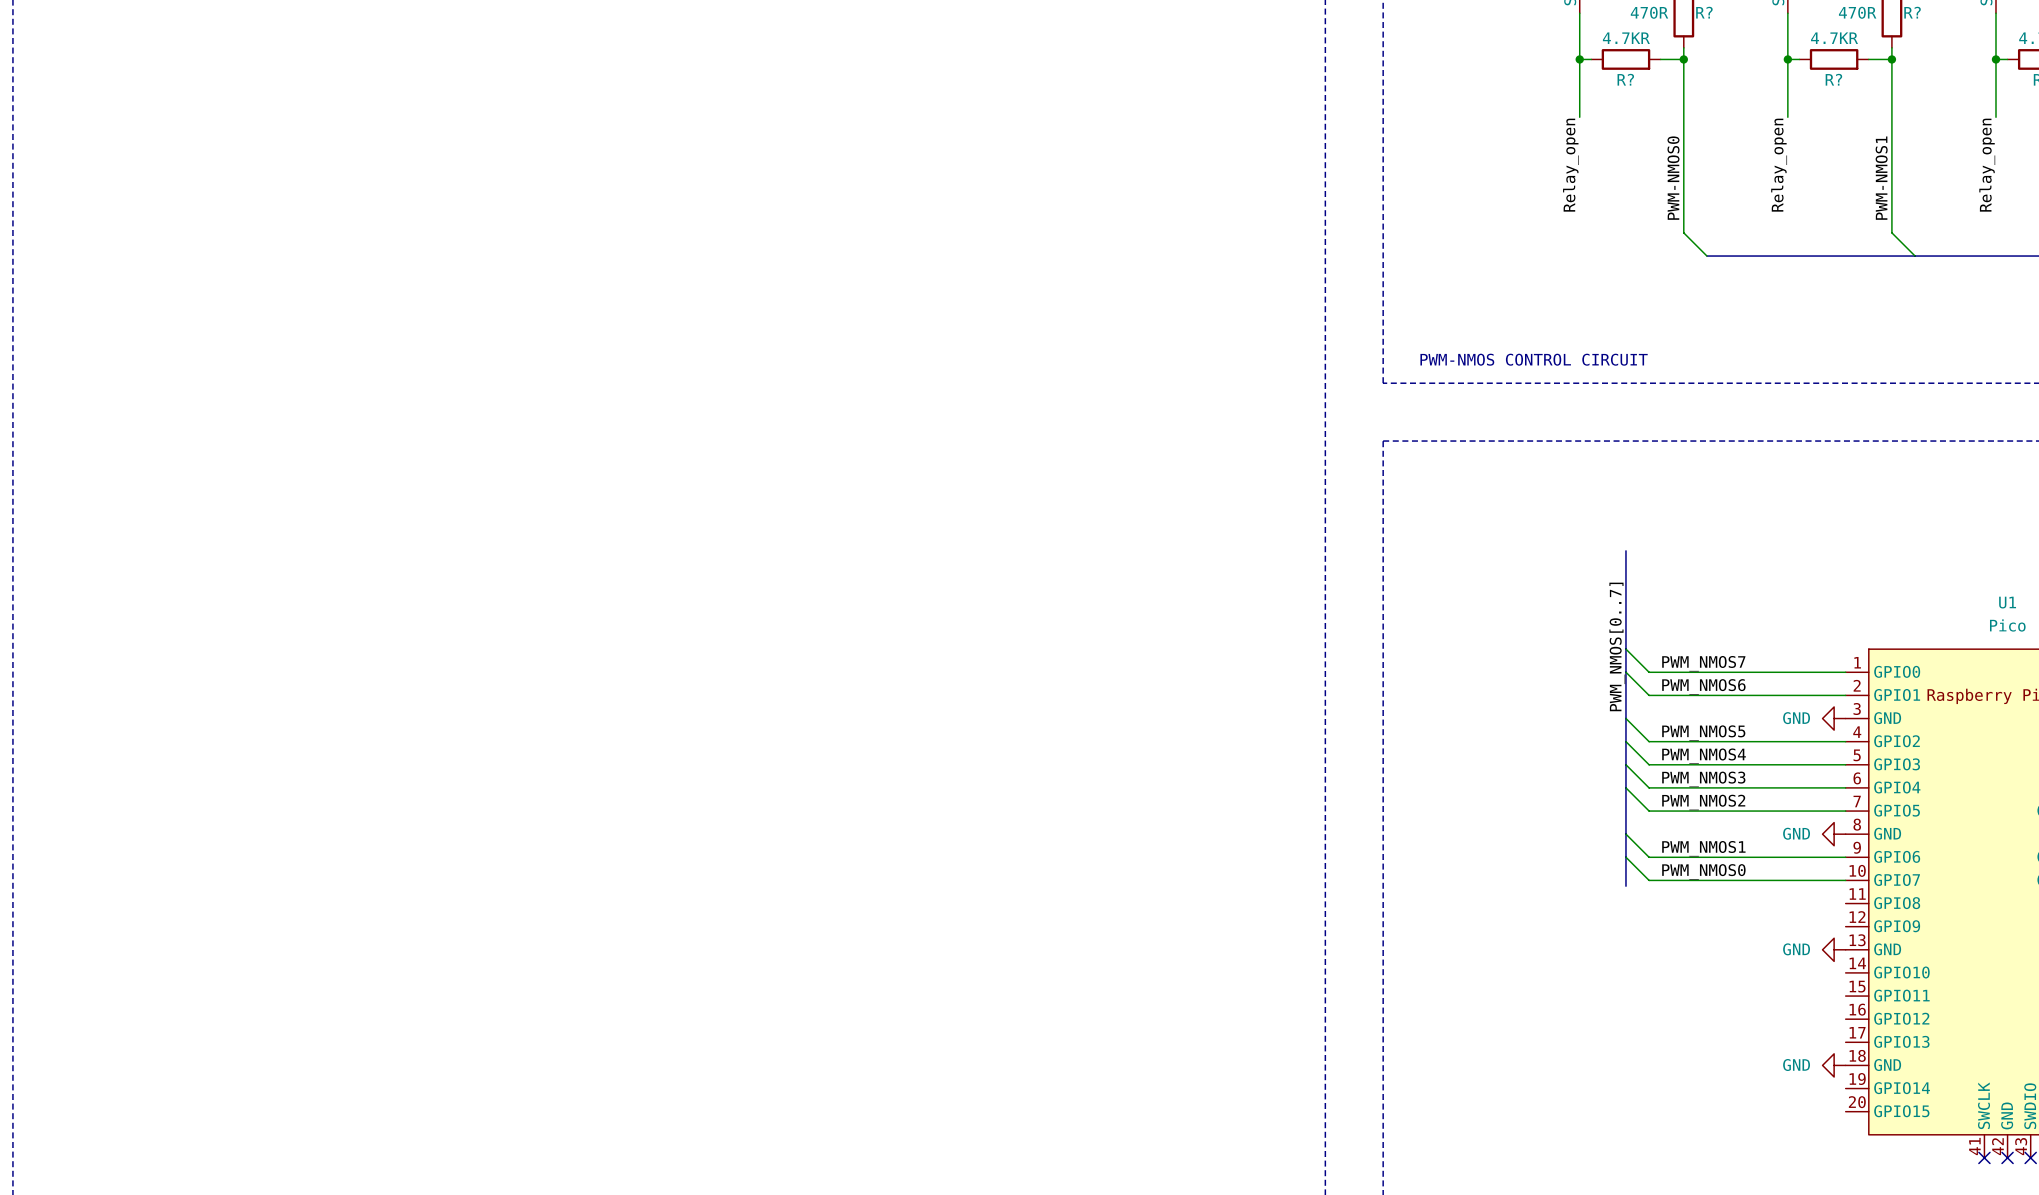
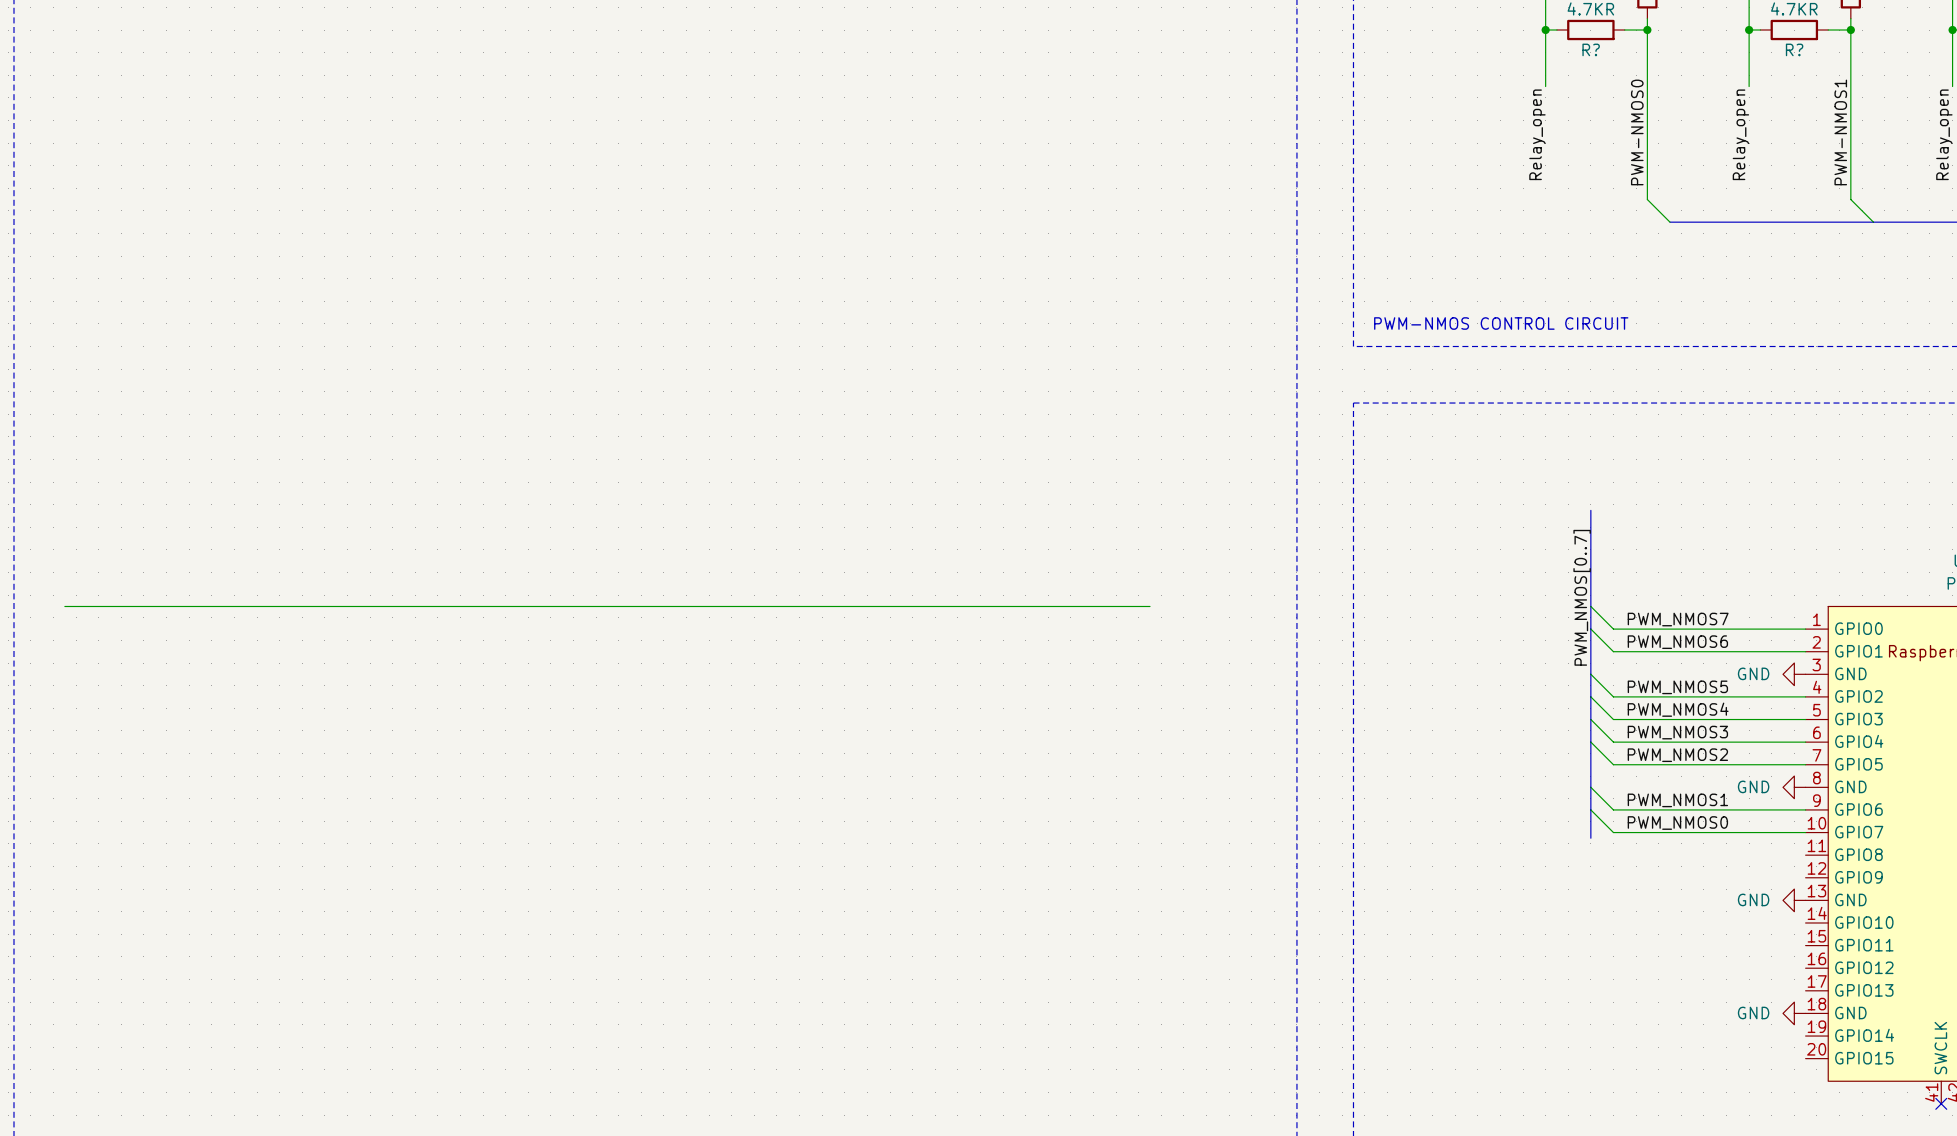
wire: none -> (64, 606) (1150, 606)

